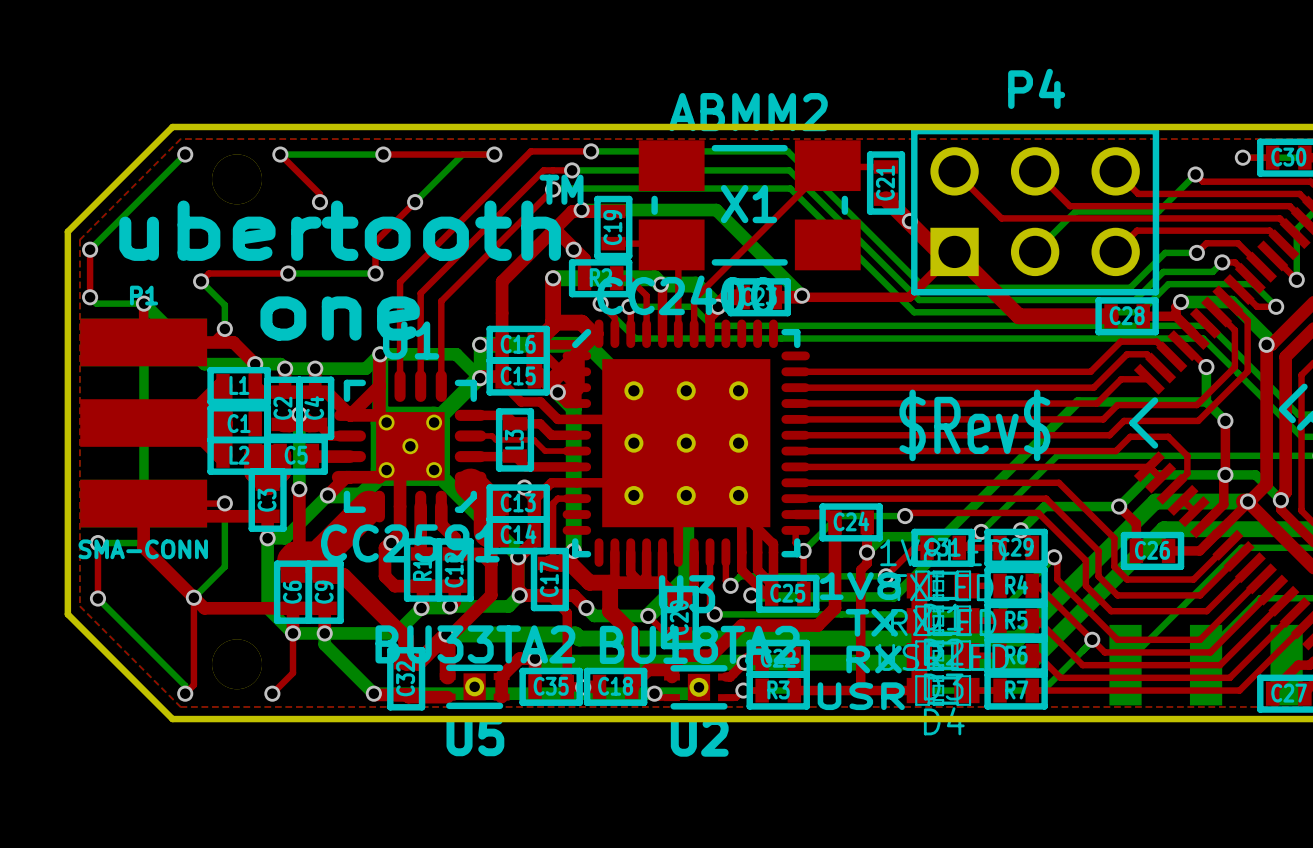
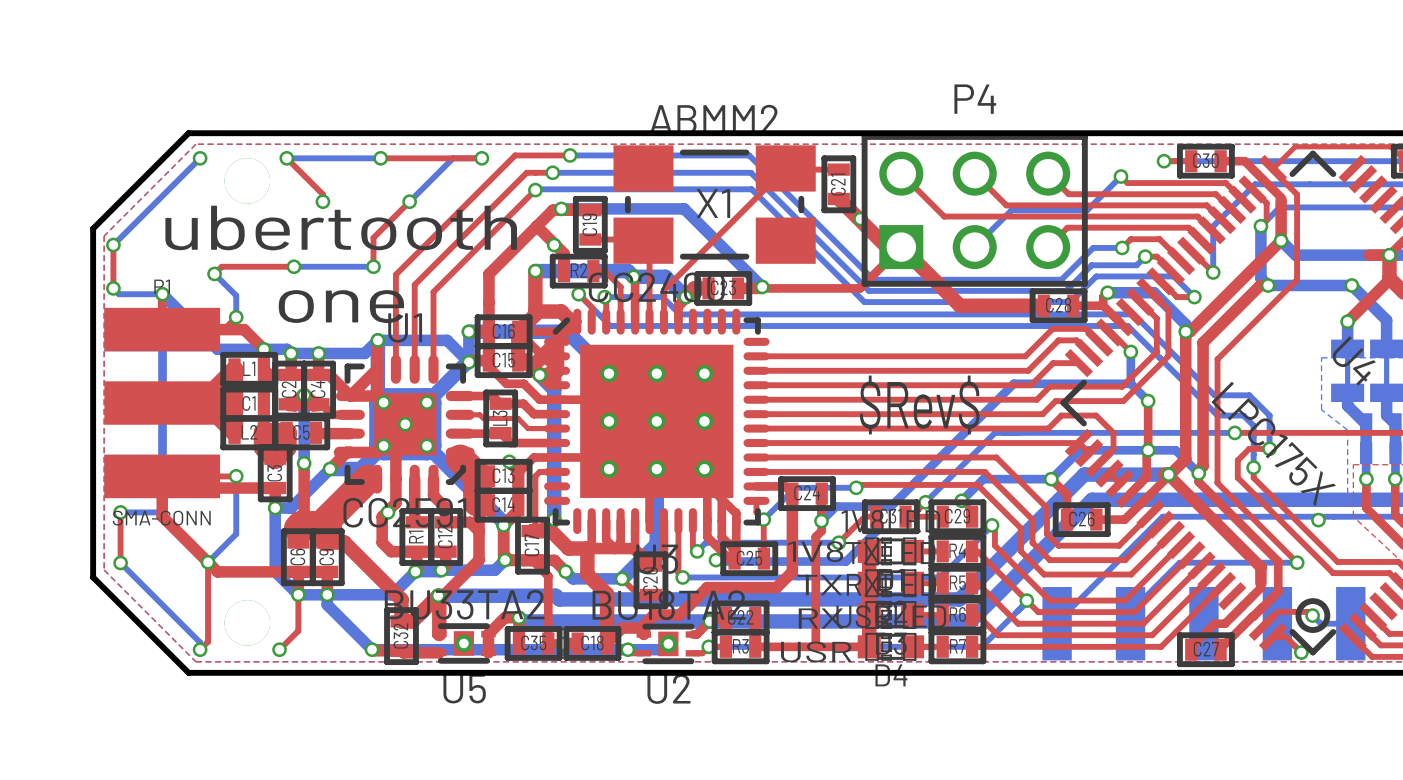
text: TM (561, 189) -> none

